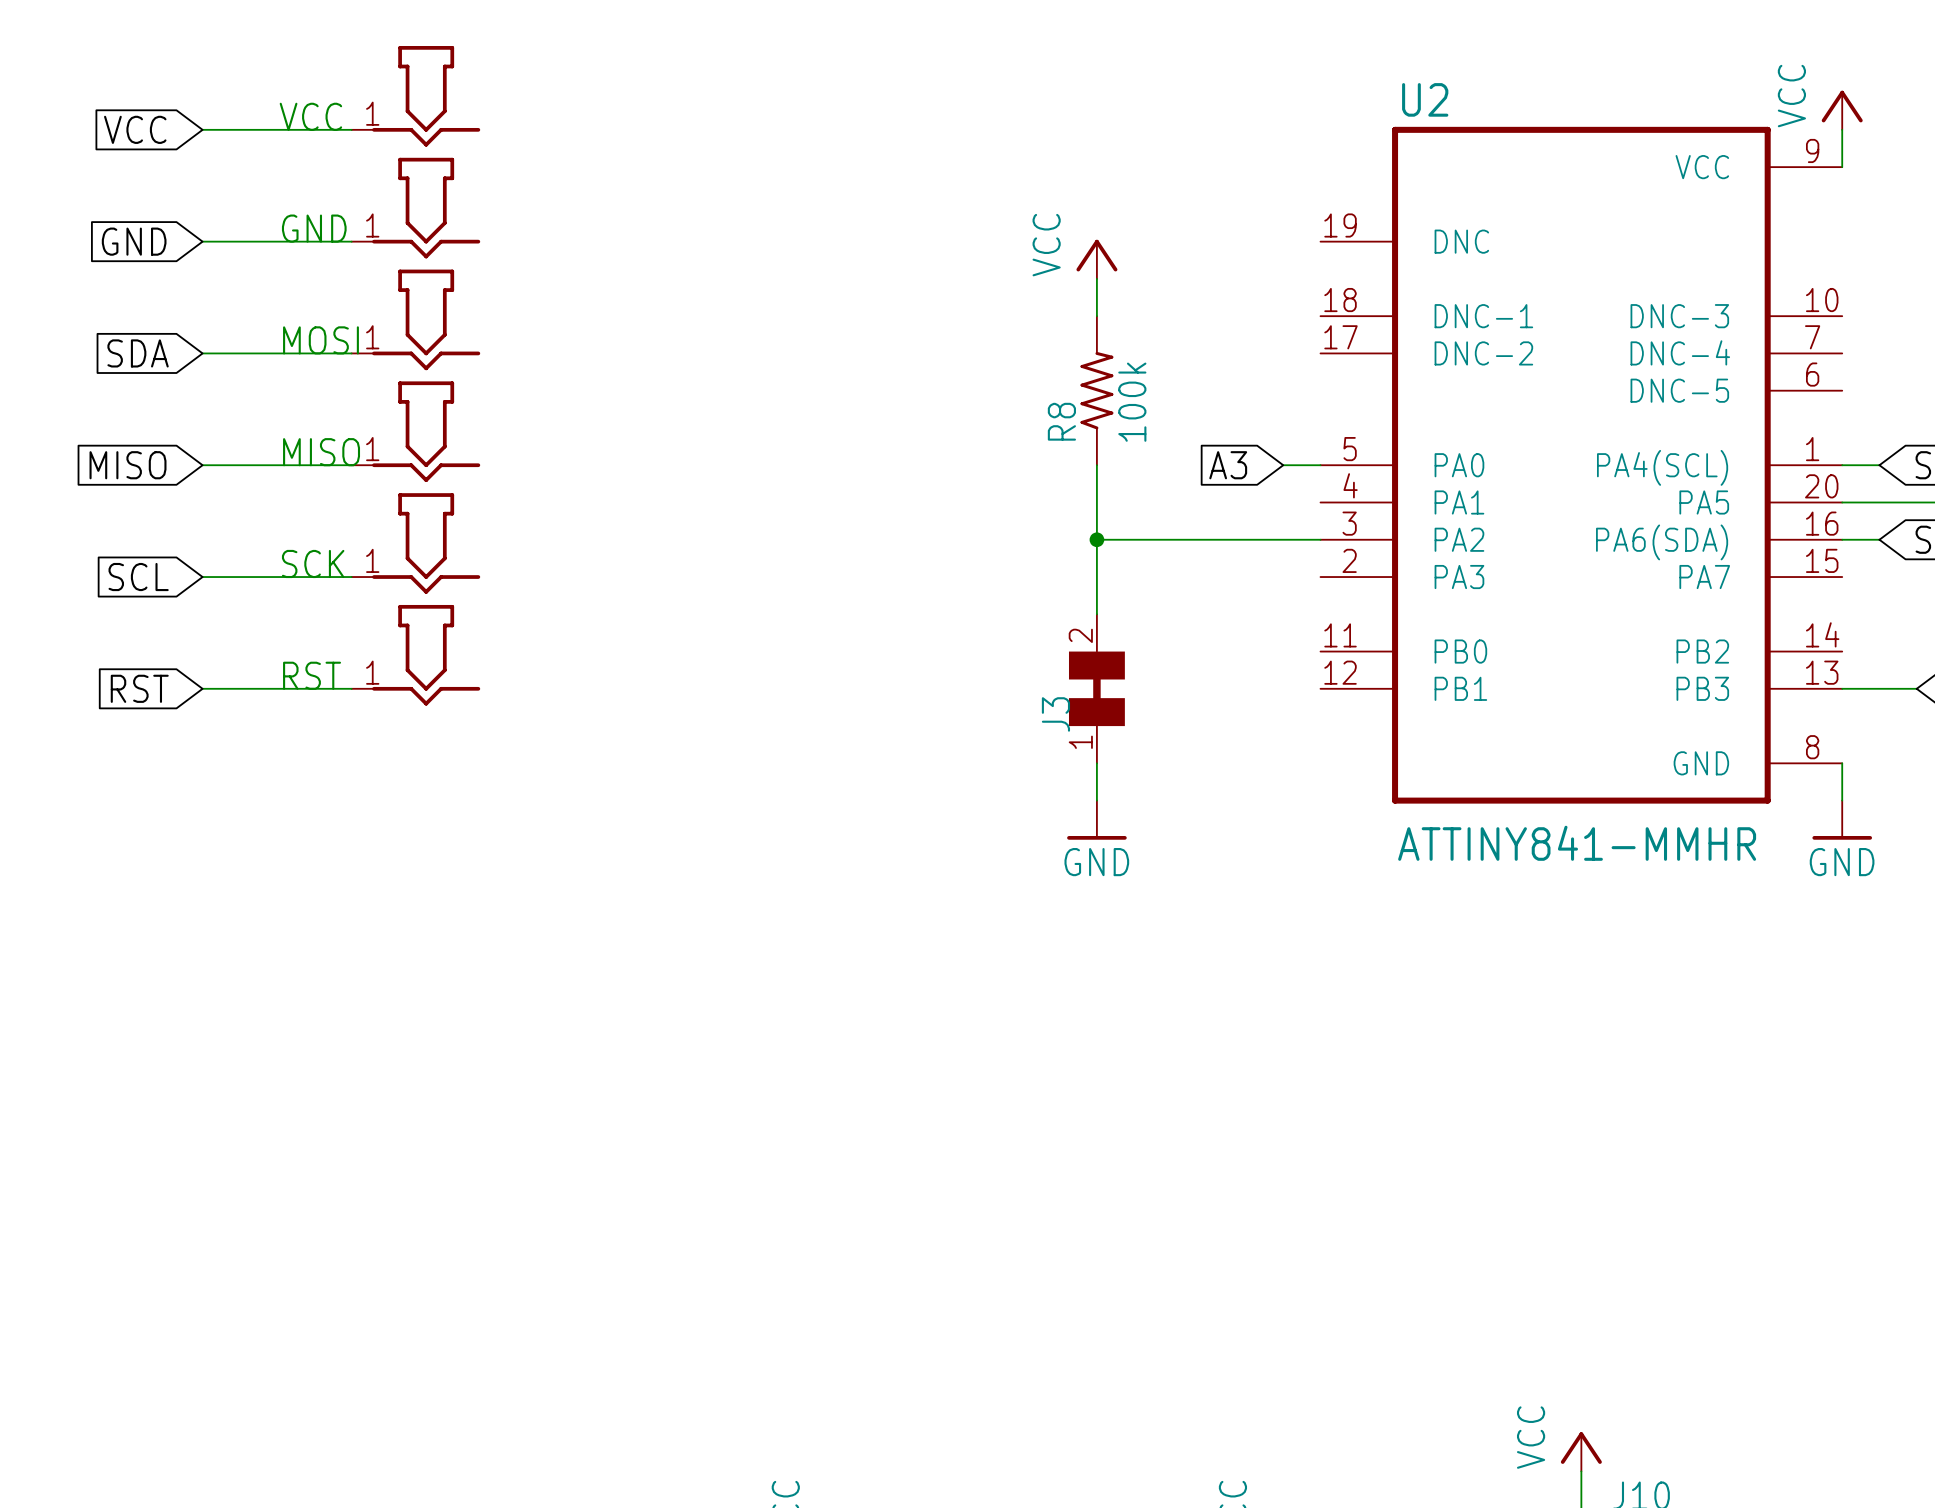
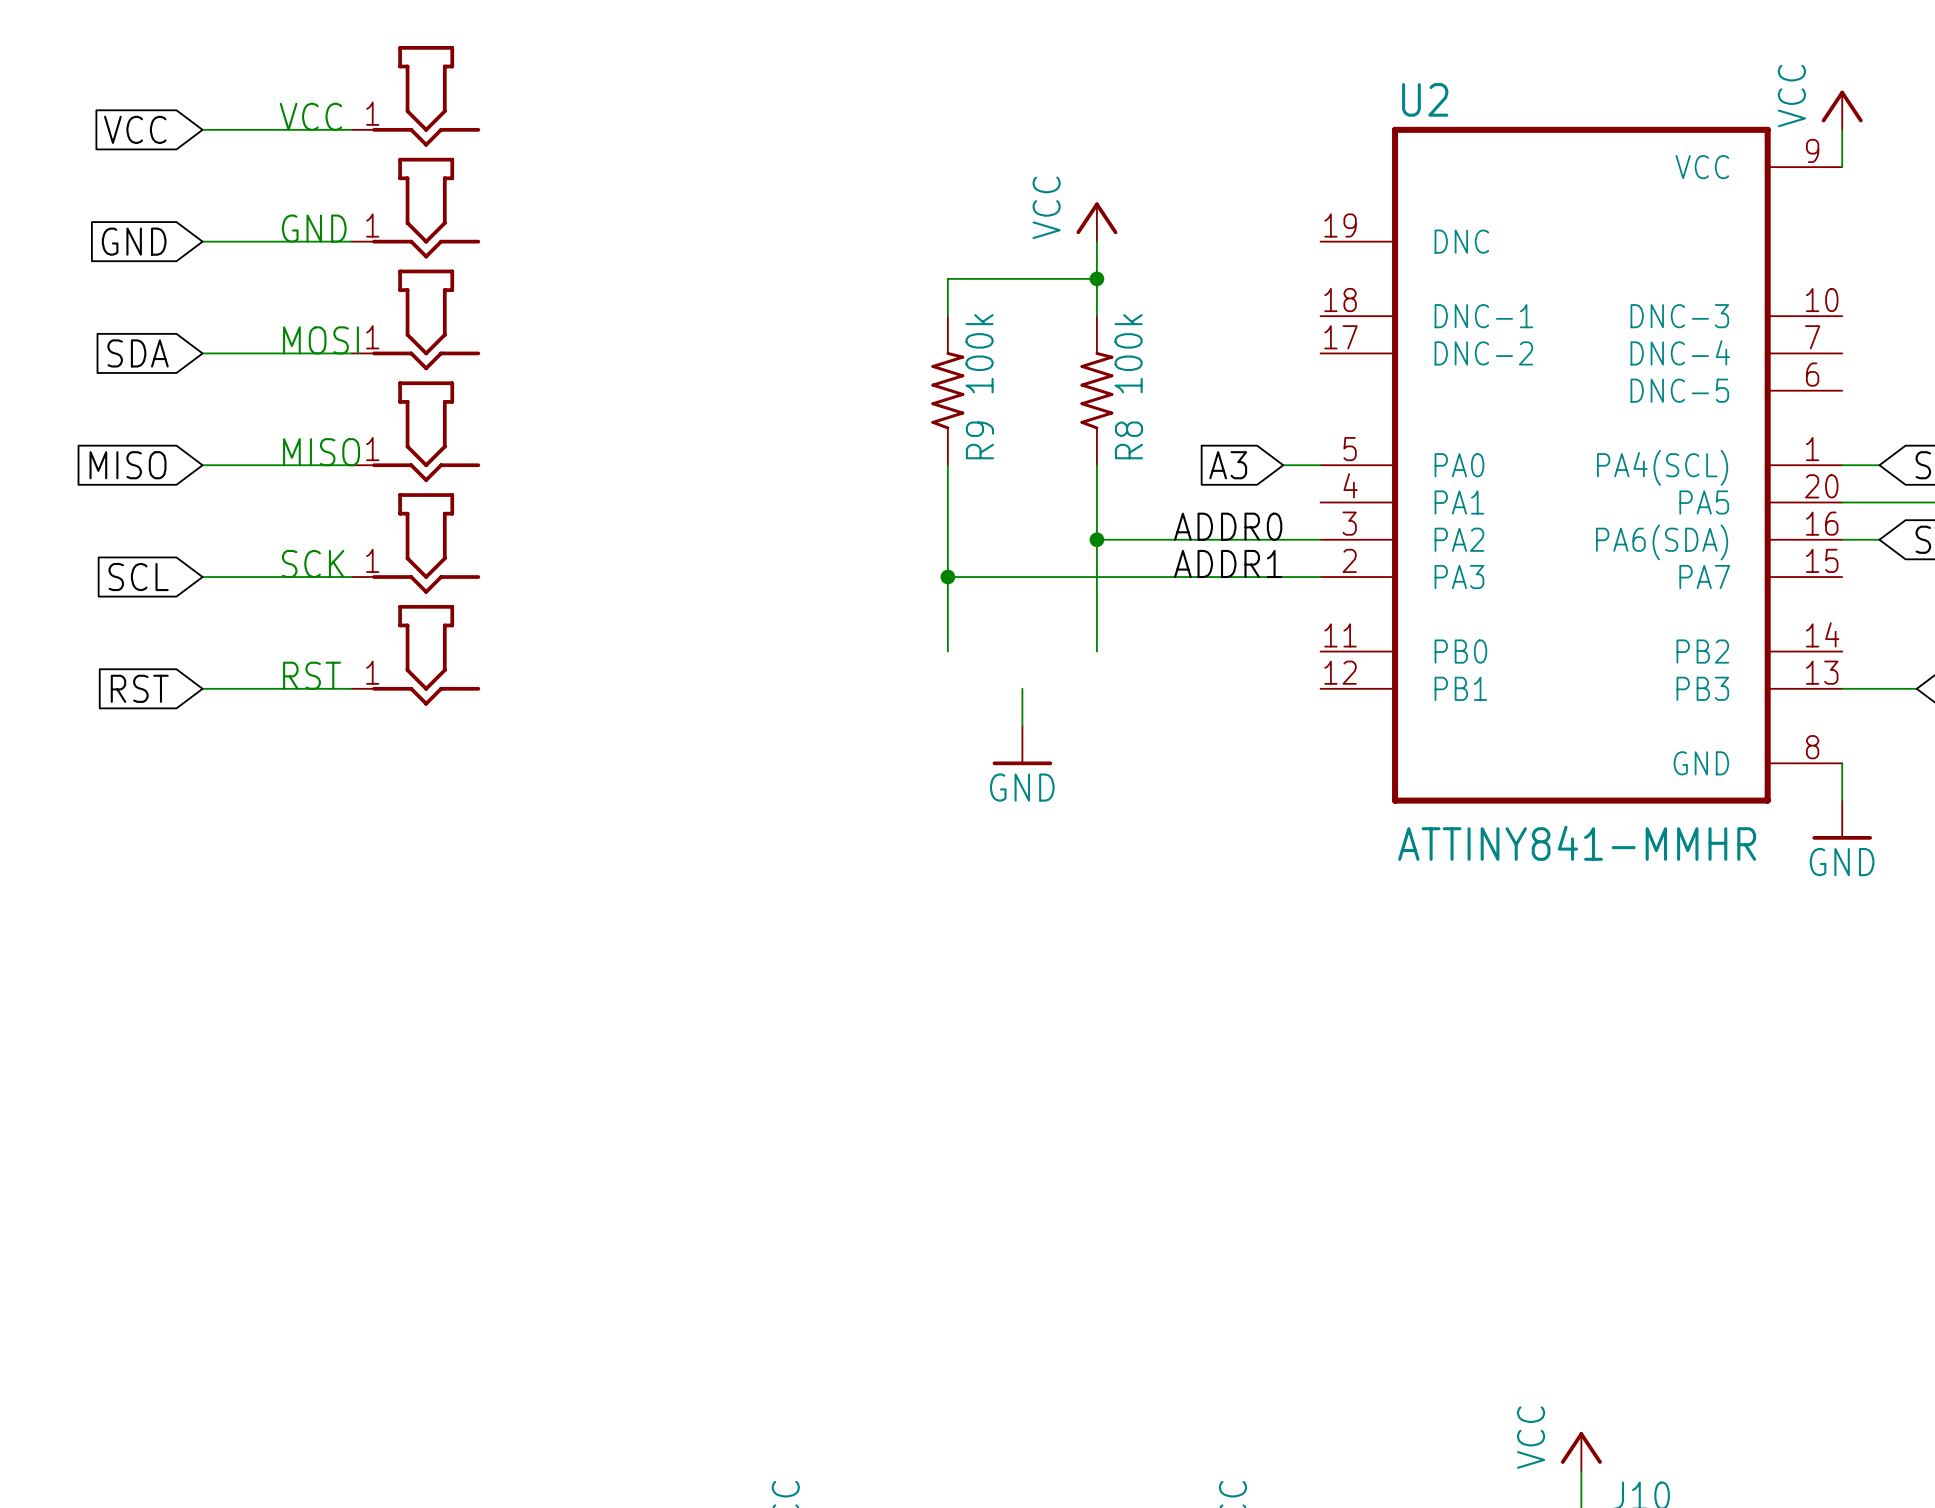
wire: none -> (1096, 241) (1096, 278) (947, 278) (947, 316)
power symbol position: VCC (1096, 259) -> VCC (1096, 222)
junction: none -> (1096, 278)
R9: none -> 100k (947, 390)
R8 value position: 100k (1132, 402) -> 100k (1128, 353)
R8 name position: R8 (1061, 421) -> R8 (1128, 440)
wire: none -> (947, 465) (947, 651)
label: none -> ADDR0 (1228, 526)
label: none -> ADDR1 (1228, 563)
wire: none -> (947, 577) (1320, 577)
junction: none -> (947, 577)
J3: (1096, 688) -> none
wire: (1096, 763) (1096, 800) -> (1022, 688) (1022, 726)
power symbol position: GND (1096, 820) -> GND (1022, 745)

